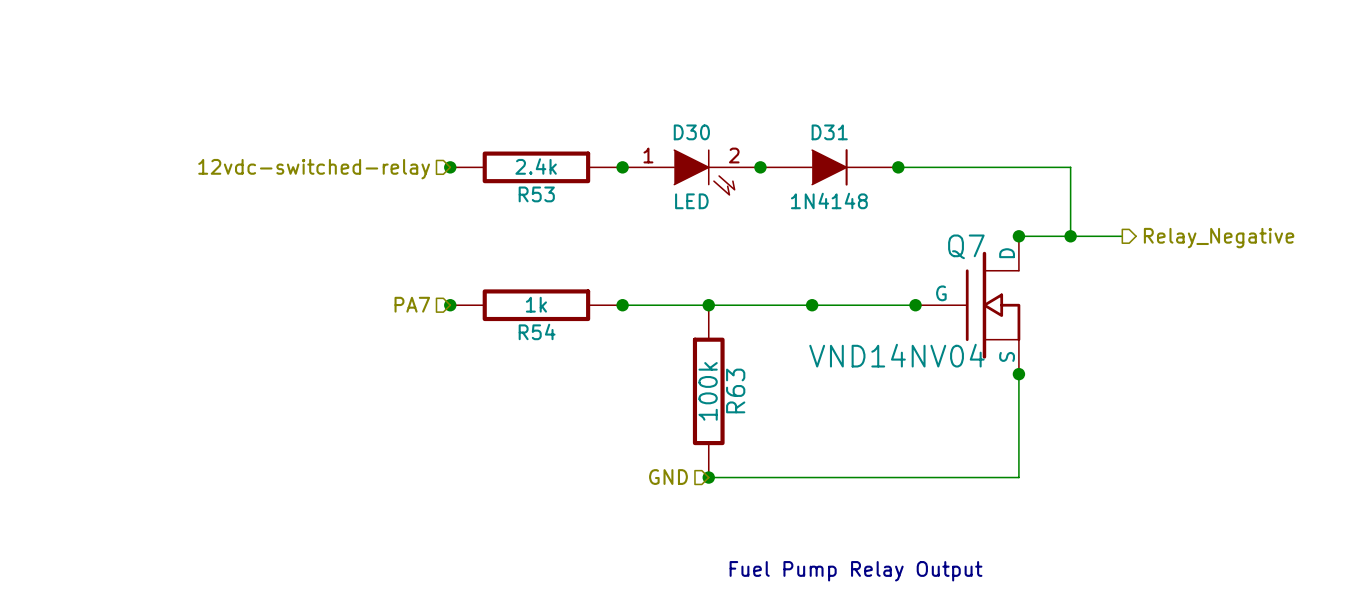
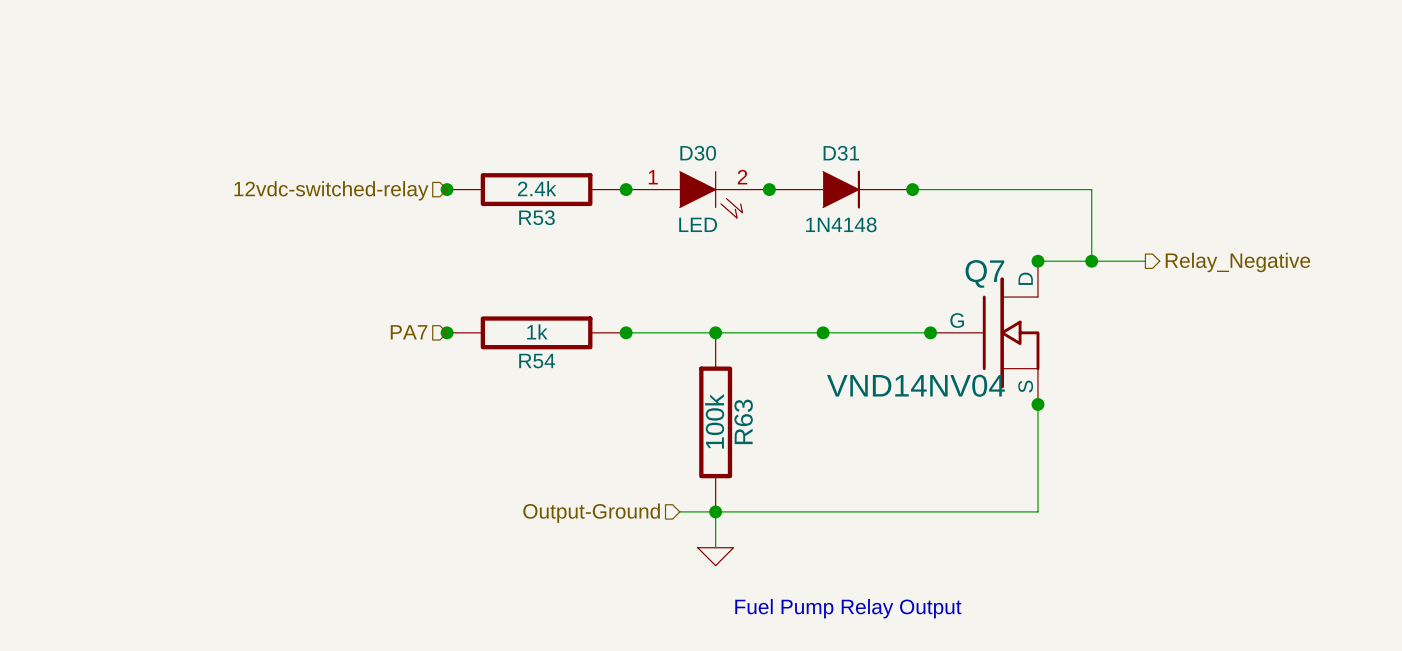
hierarchical label: GND (668, 477) -> none
wire: none -> (679, 511) (715, 511) (715, 547)
hierarchical label: none -> Output-Ground (591, 513)
power symbol: none -> (715, 556)

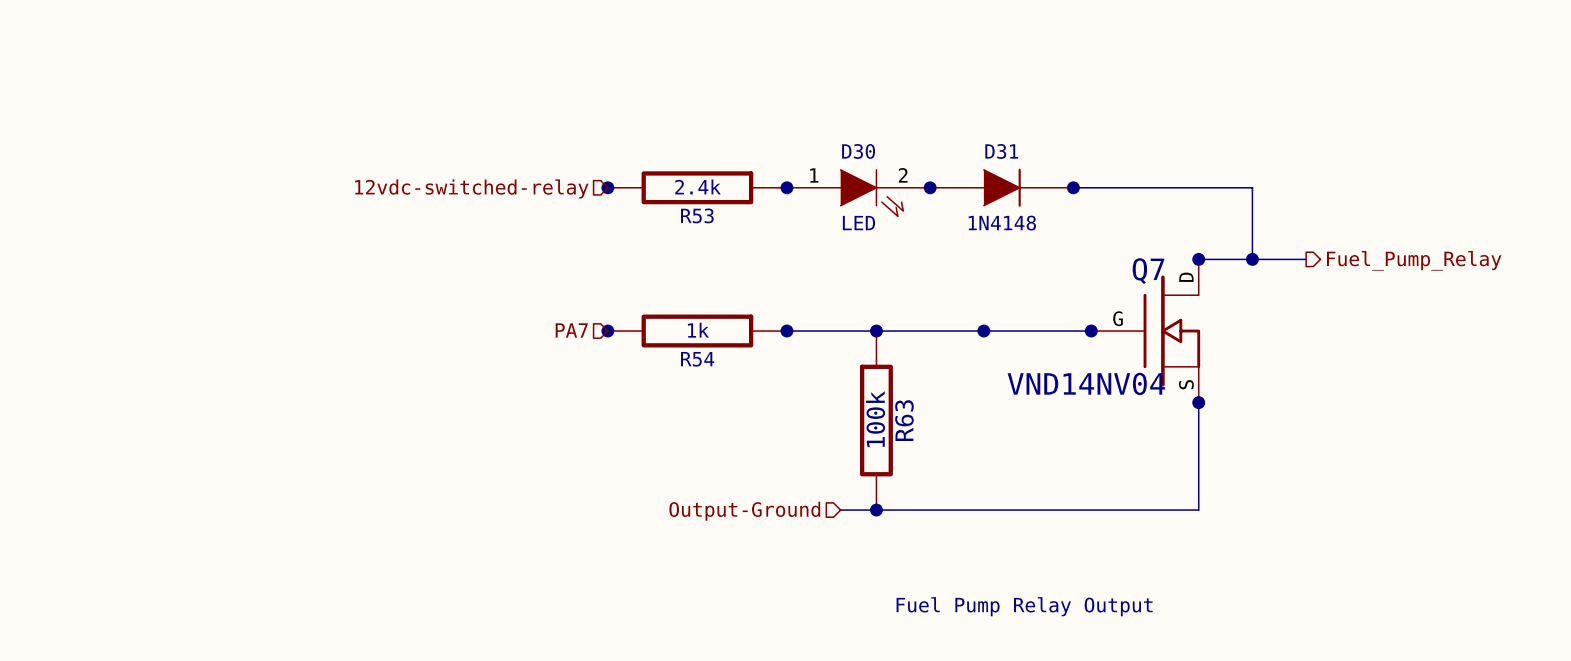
hierarchical label: Relay_Negative (1237, 262) -> Fuel_Pump_Relay (1414, 260)
wire: (715, 511) (715, 547) -> none
power symbol: (715, 556) -> none

